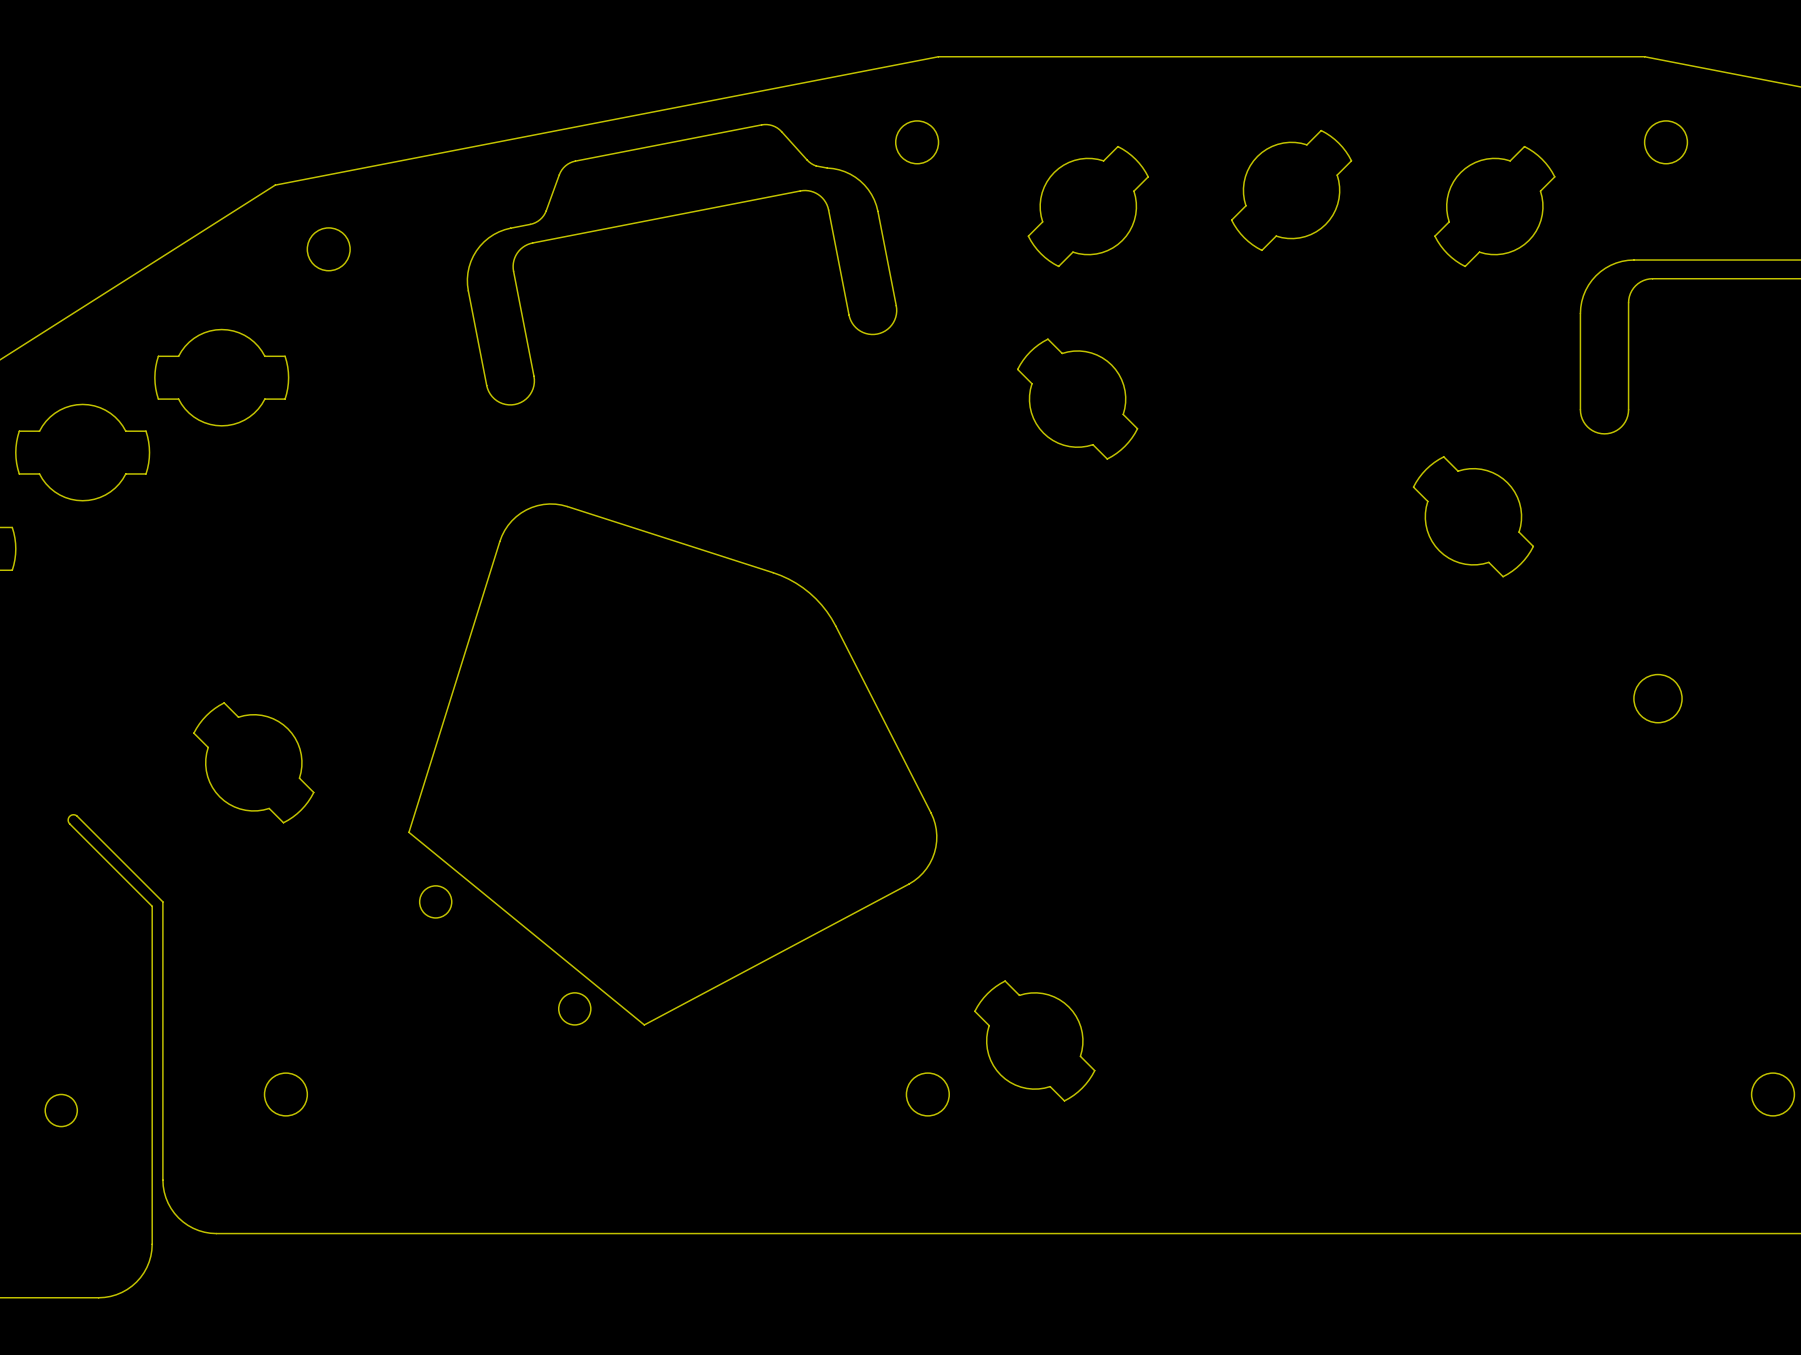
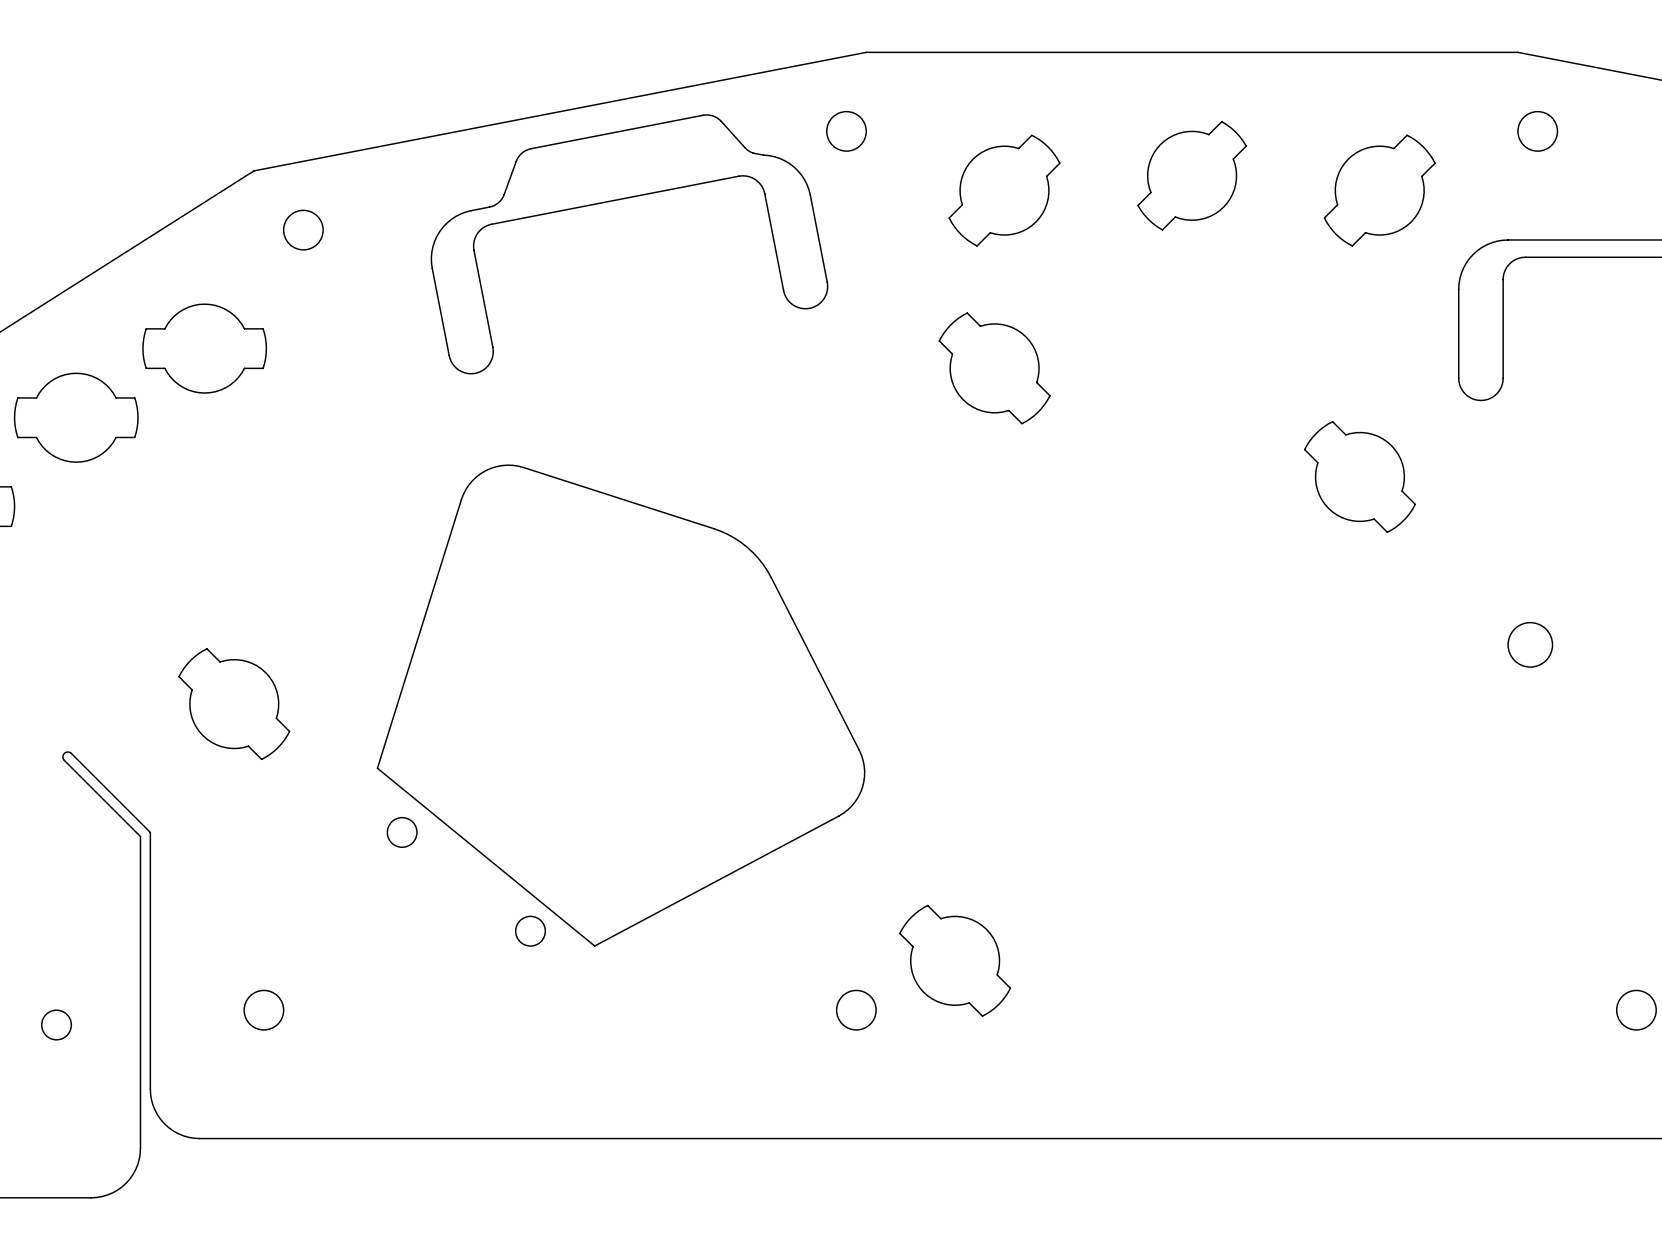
board edge: none -> (1221, 121) (1208, 134) (1188, 131) (1173, 135) (1164, 140) (1154, 152) (1147, 172) (1150, 192) (1137, 205) (1148, 219) (1162, 229) (1175, 216) (1190, 220) (1210, 216) (1223, 207) (1229, 199) (1236, 179) (1233, 159) (1246, 146) (1235, 132) (1221, 121)
part: (1291, 190) -> none

